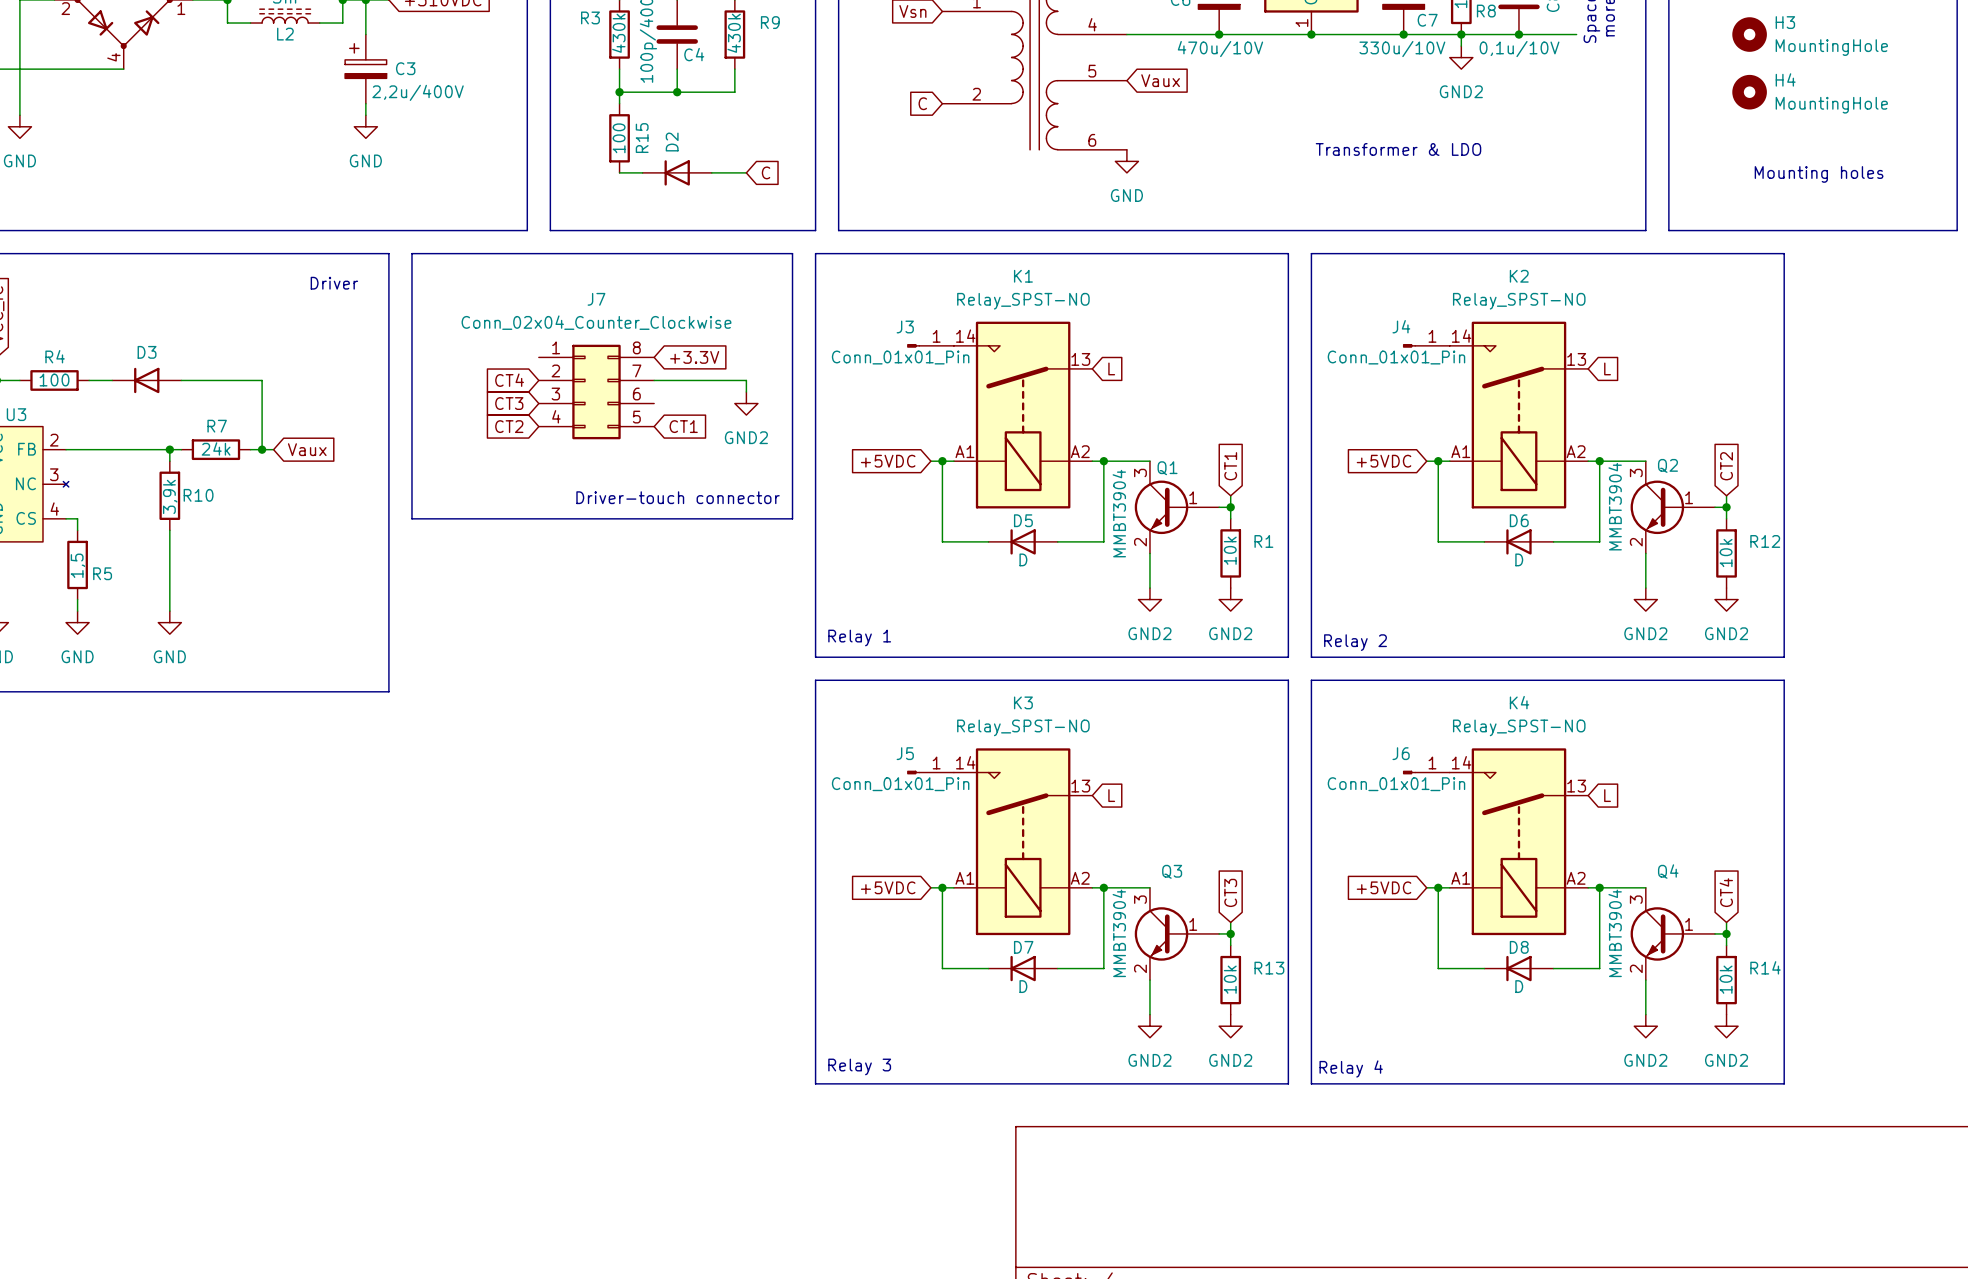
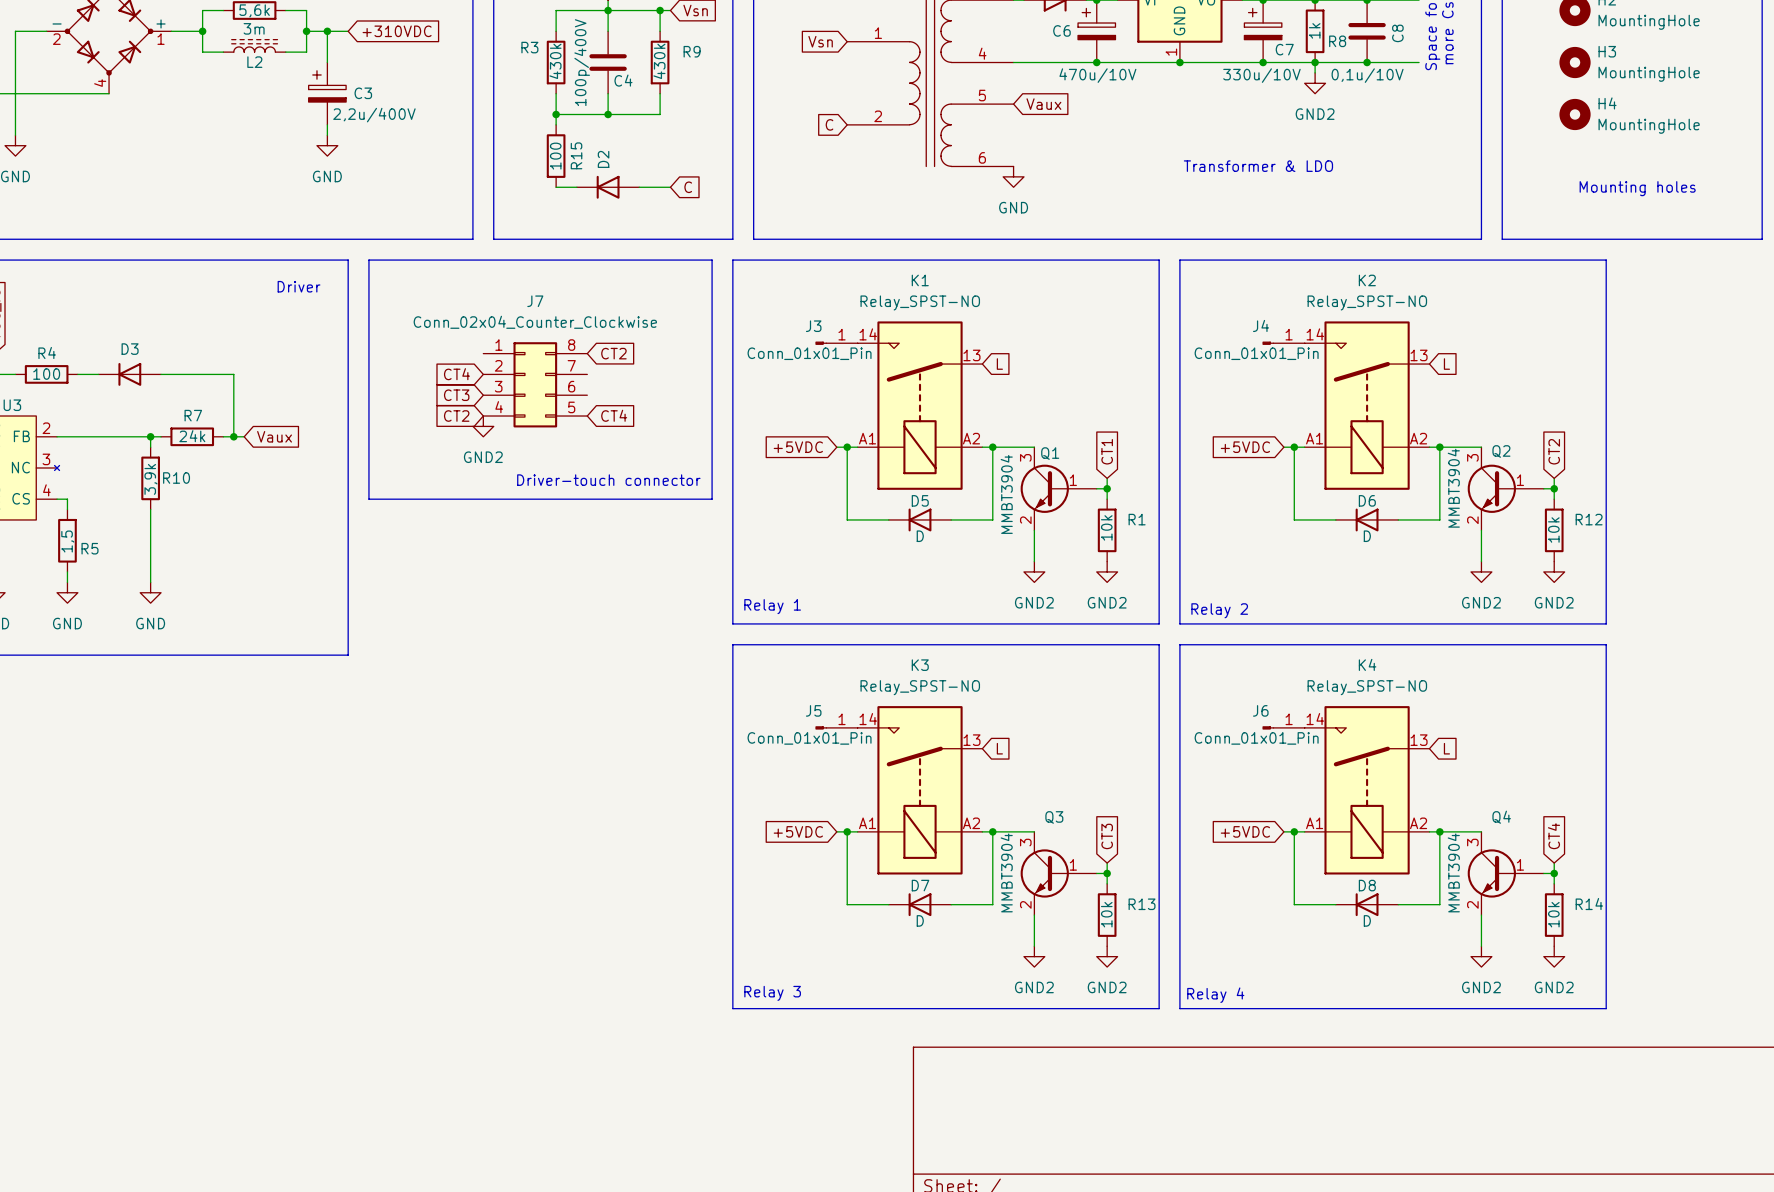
global label: +3.3V (694, 357) -> CT2 (613, 353)
wire: (654, 380) (746, 380) (746, 392) -> none
power symbol position: GND2 (746, 403) -> GND2 (483, 426)
global label: CT1 (683, 426) -> CT4 (614, 415)

